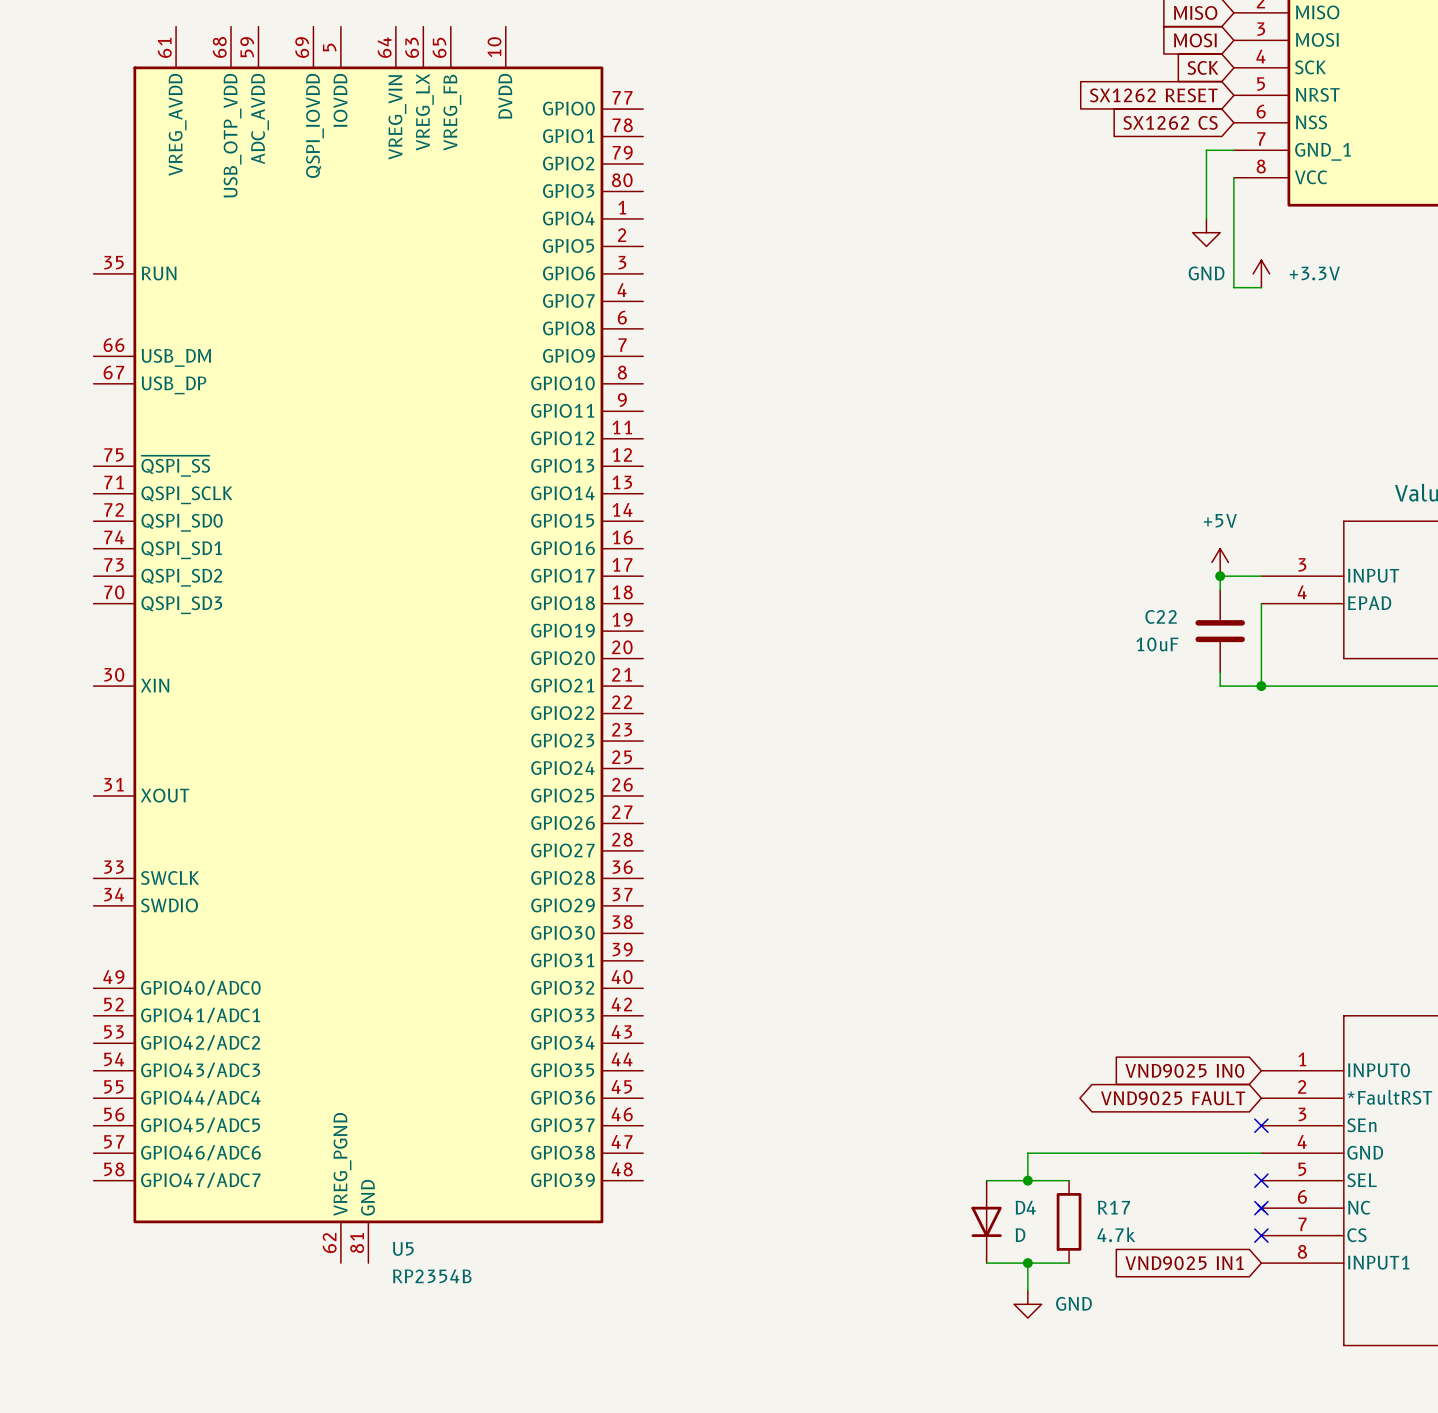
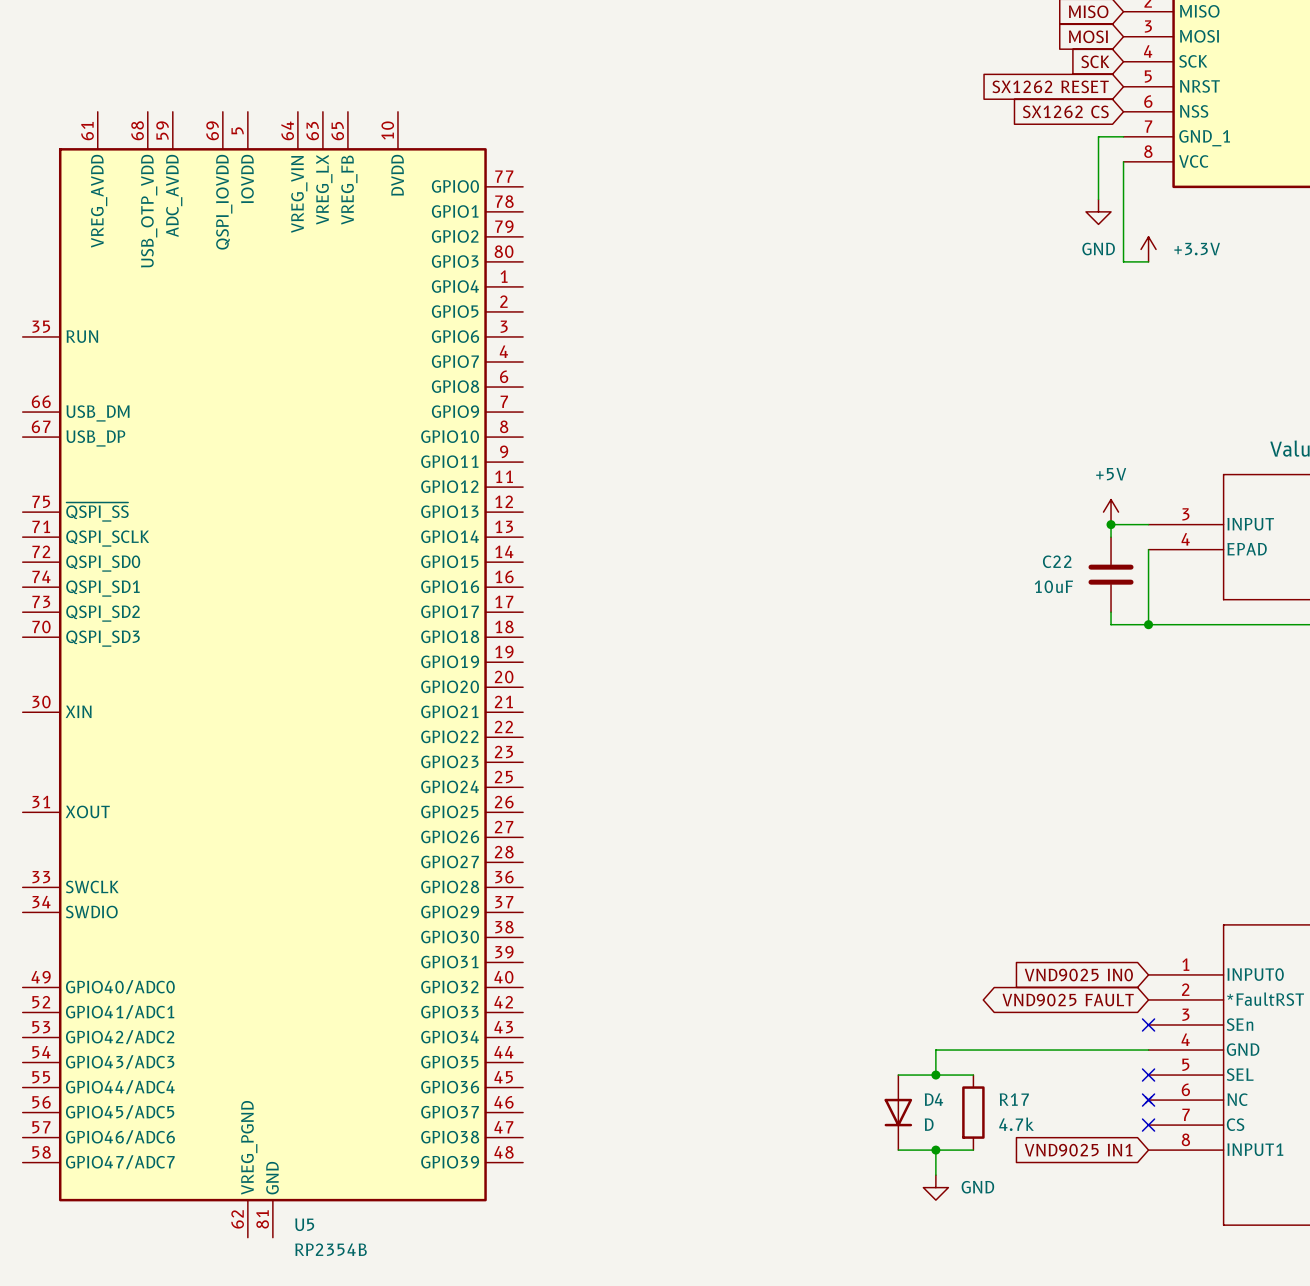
U5 position: (368, 644) -> (272, 674)

